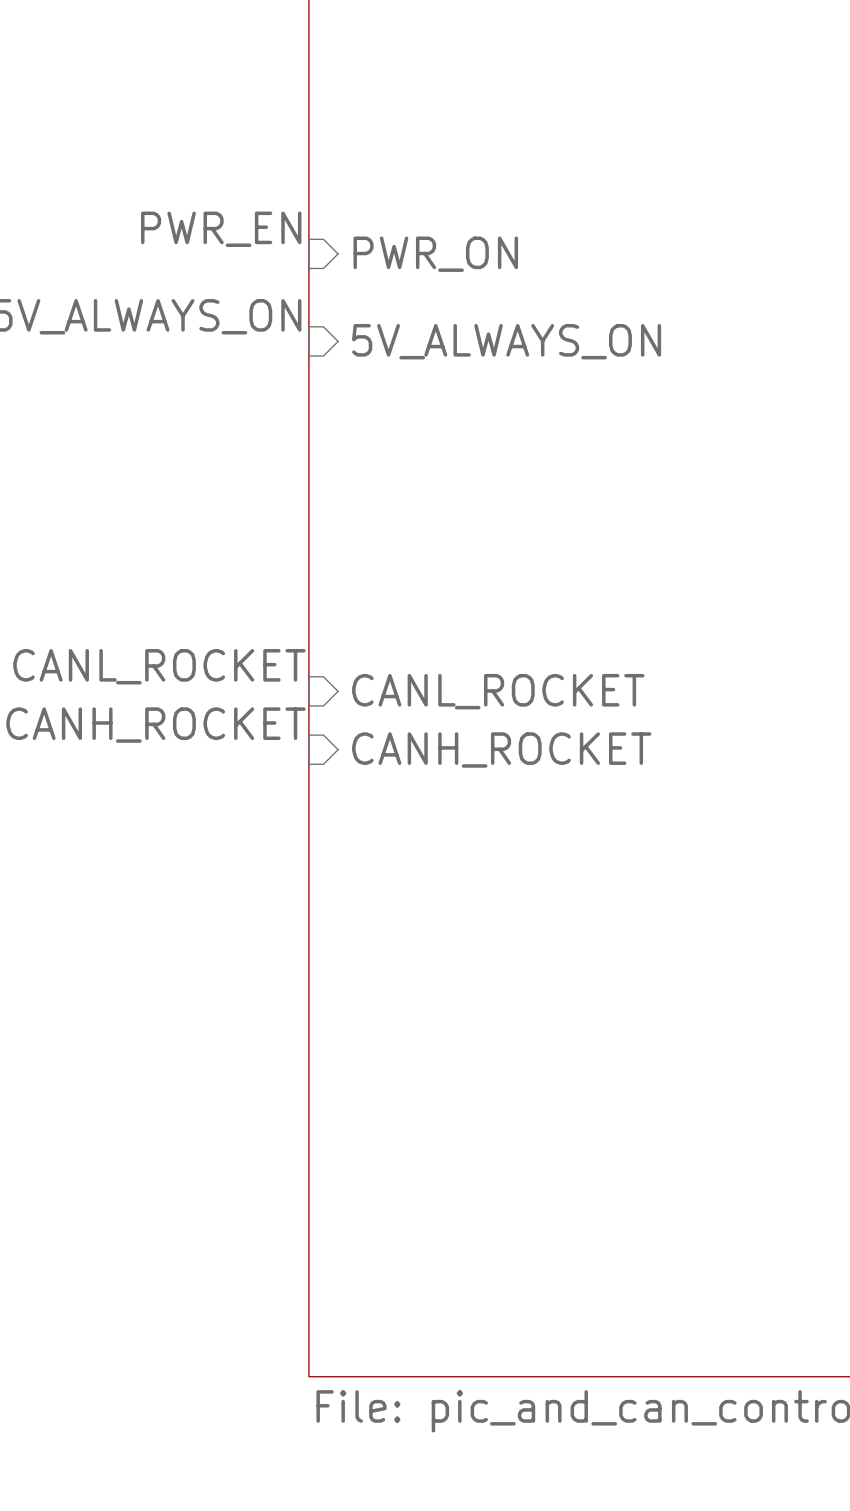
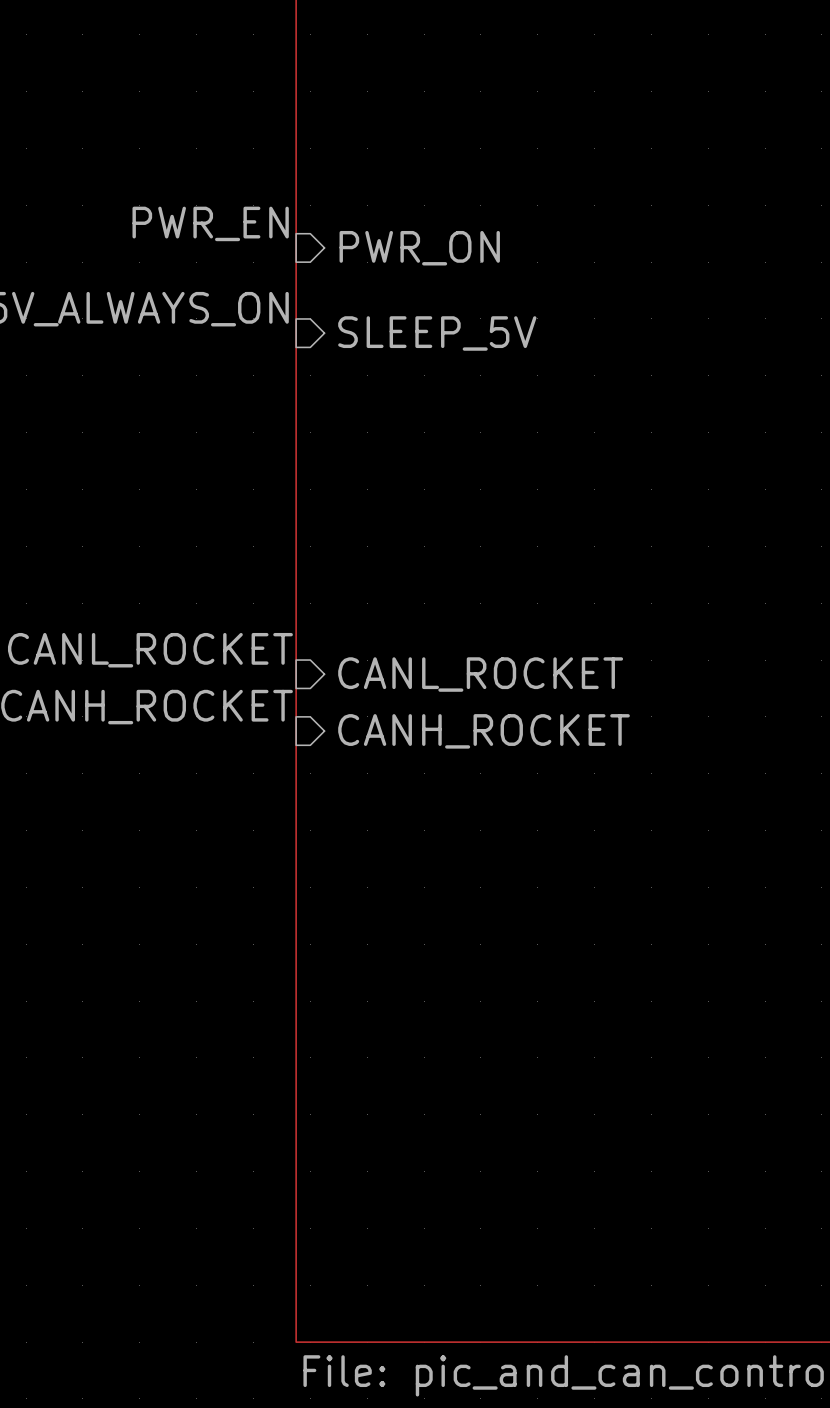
sheet pin: 5V_ALWAYS_ON (506, 341) -> SLEEP_5V (437, 333)

